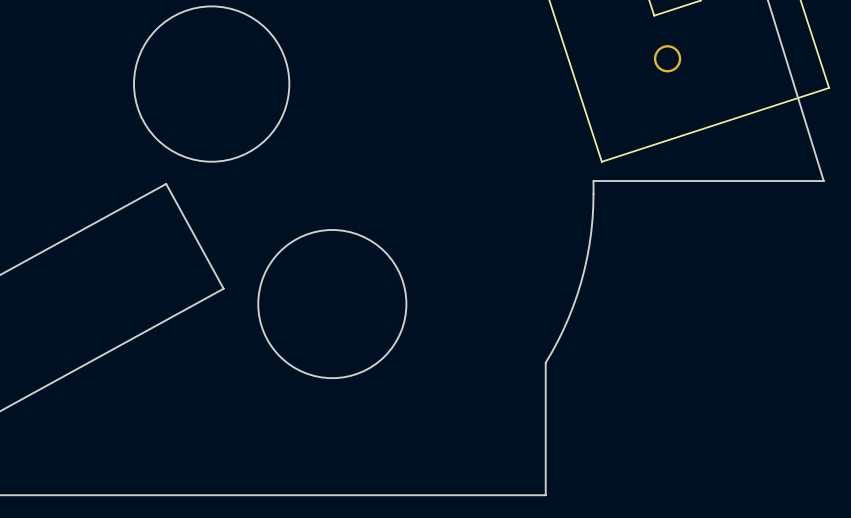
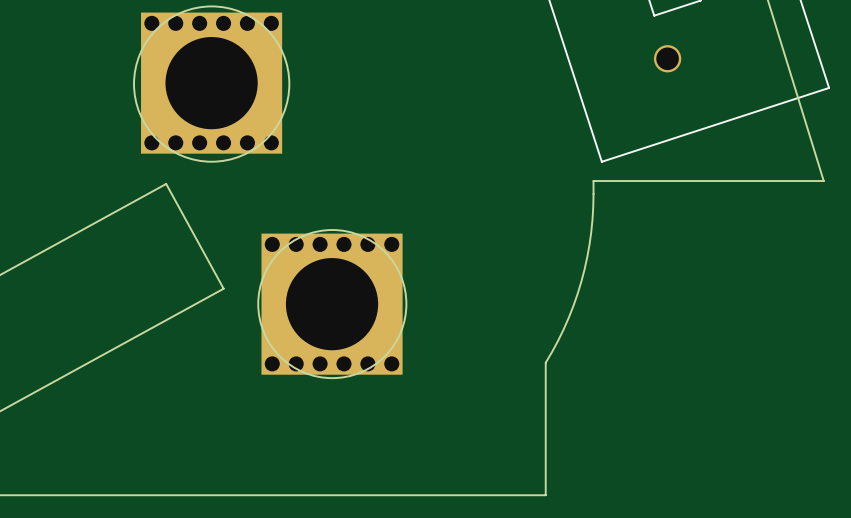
part: none -> (211, 83)
part: none -> (332, 304)

